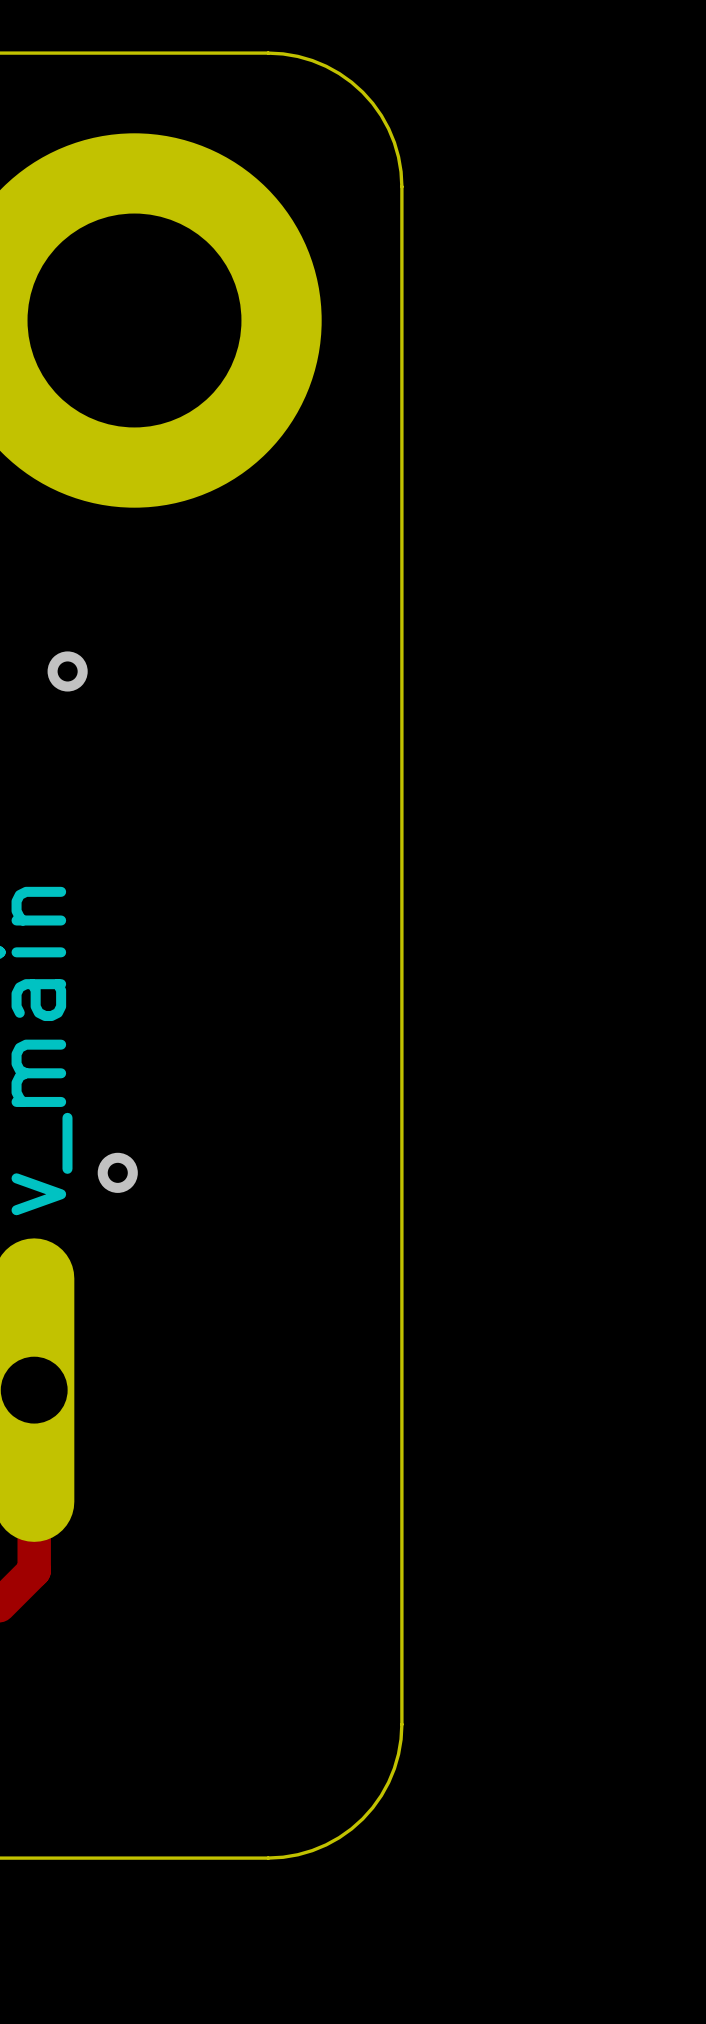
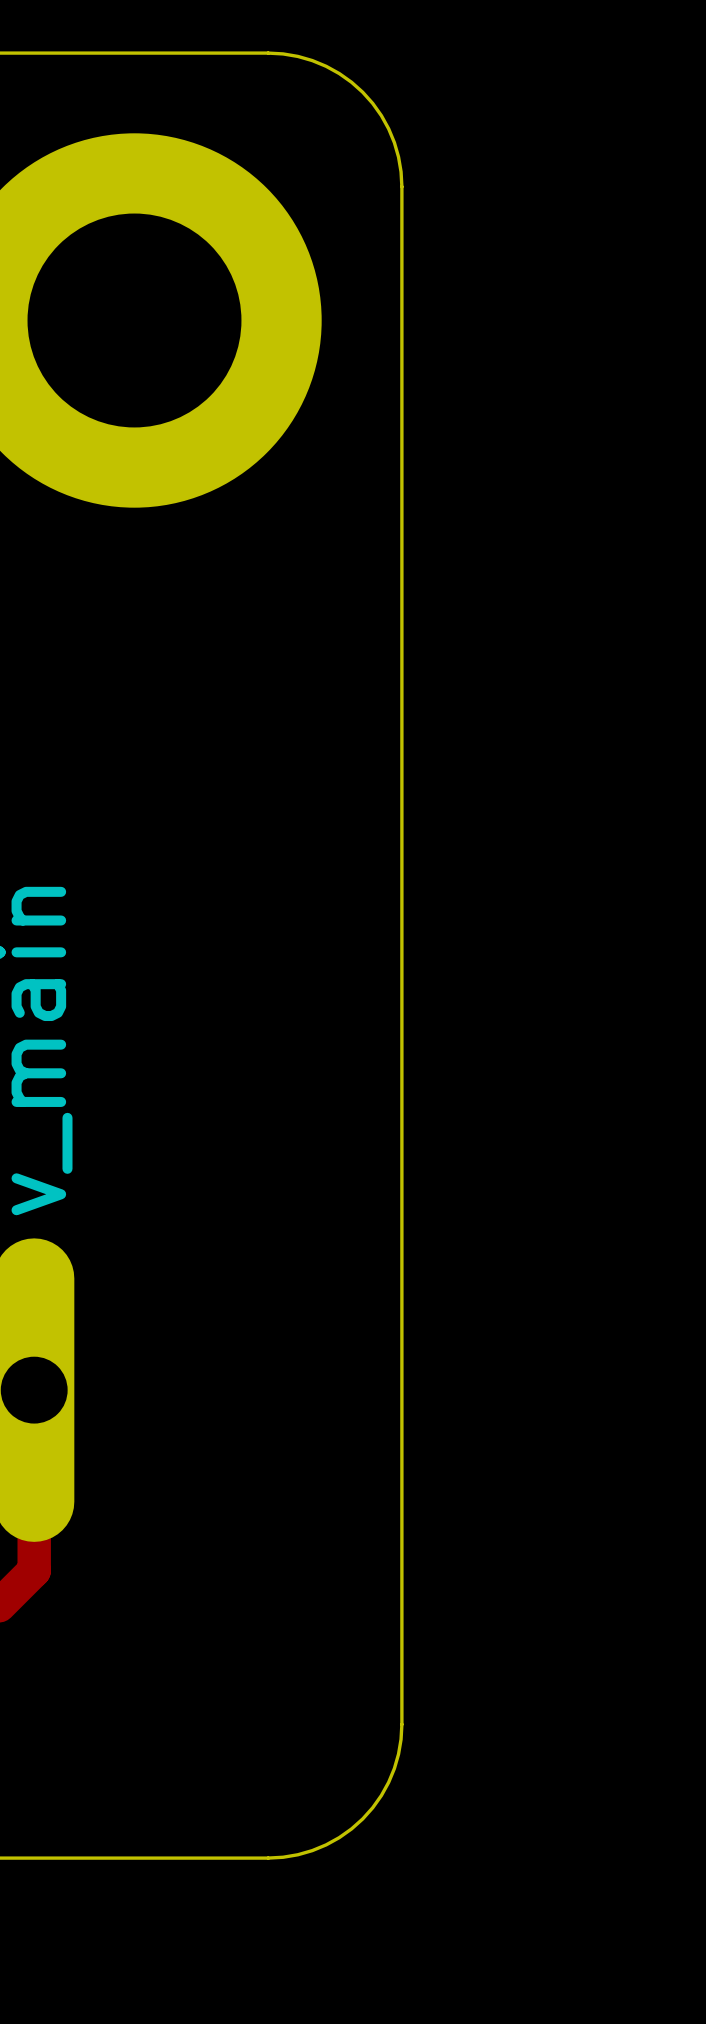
via: (67, 671) -> none
via: (117, 1172) -> none

